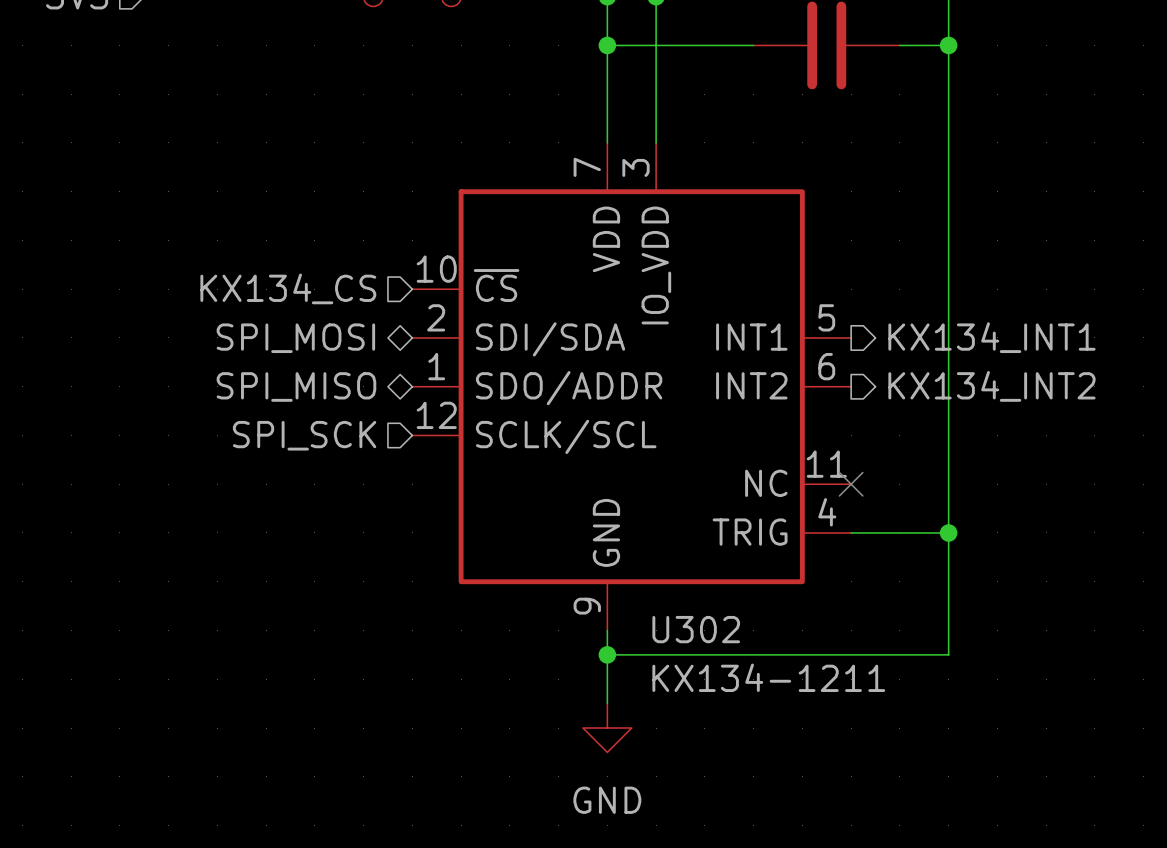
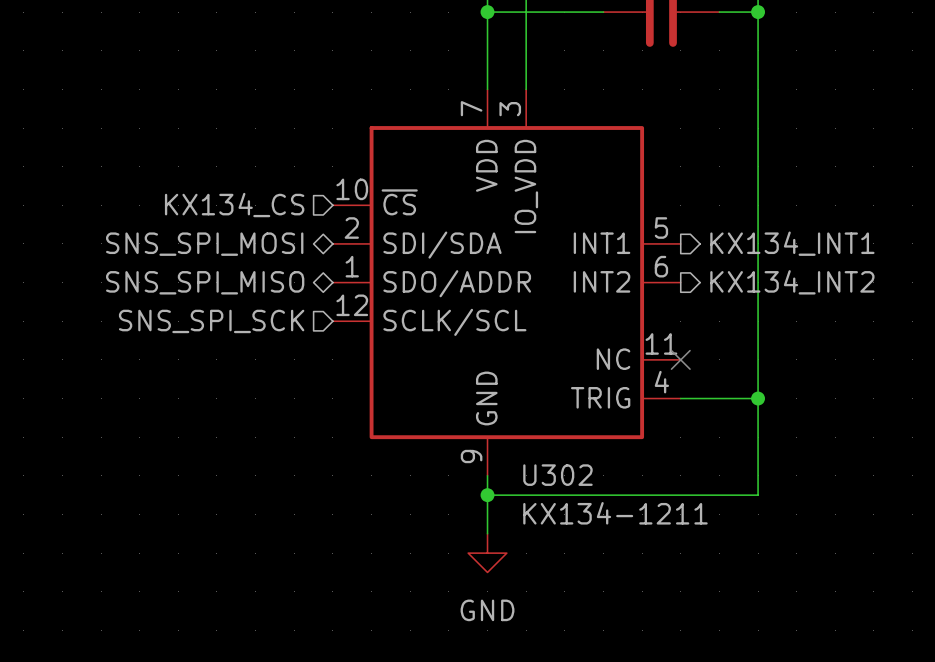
hierarchical label: SPI_MOSI (295, 338) -> SNS_SPI_MOSI (204, 244)
hierarchical label: SPI_MISO (296, 386) -> SNS_SPI_MISO (205, 282)
hierarchical label: SPI_SCK (304, 435) -> SNS_SPI_SCK (211, 321)

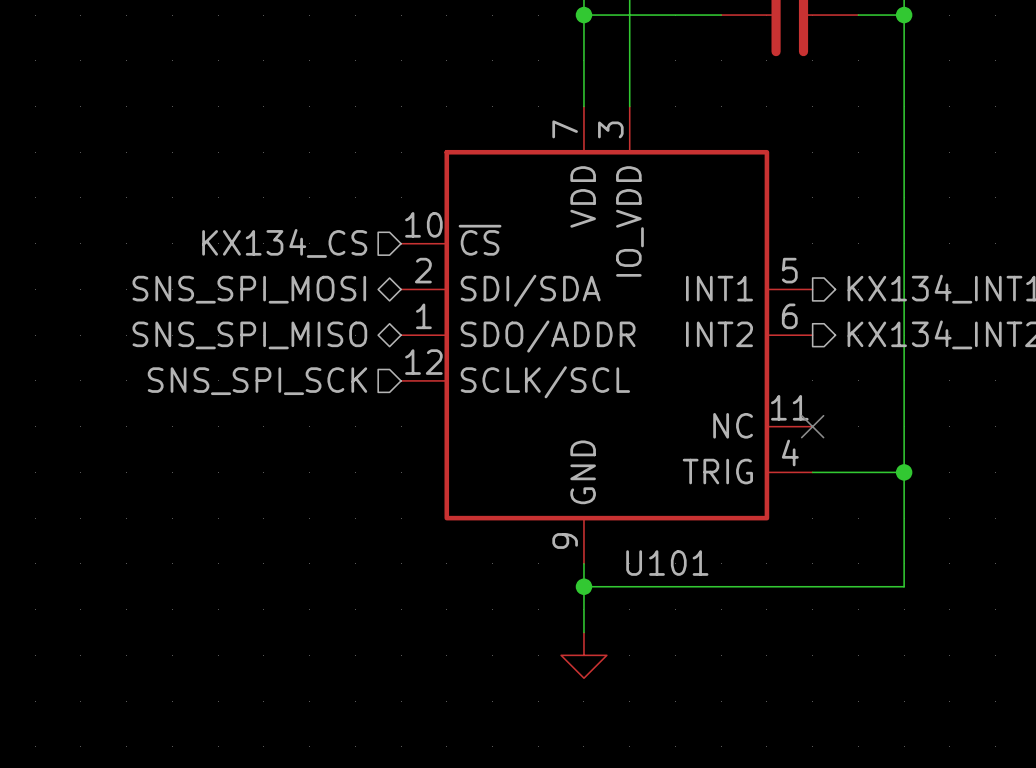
U302 name: U302 (557, 475) -> U101 (667, 563)
U302 value: KX134-1211 (615, 513) -> none
power symbol text: GND (487, 610) -> none

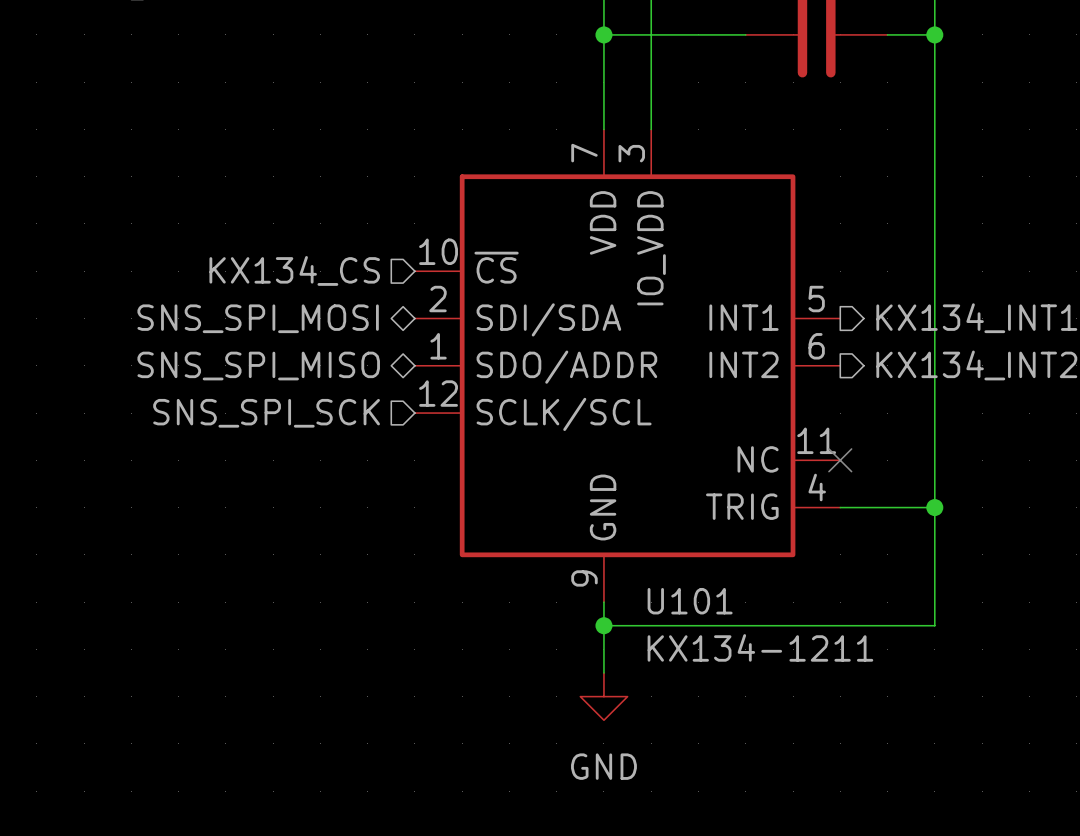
U101 value: none -> KX134-1211 (760, 647)
power symbol text: none -> GND (603, 766)

